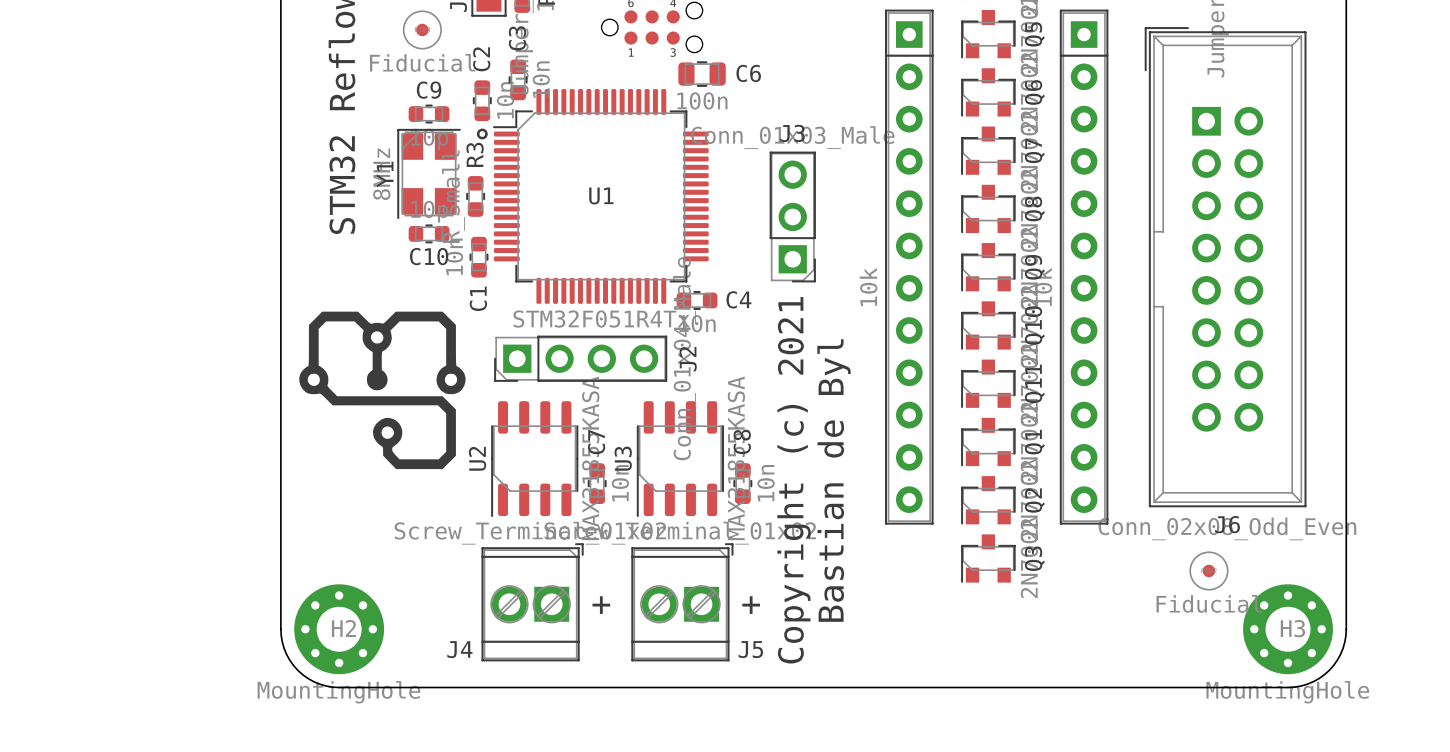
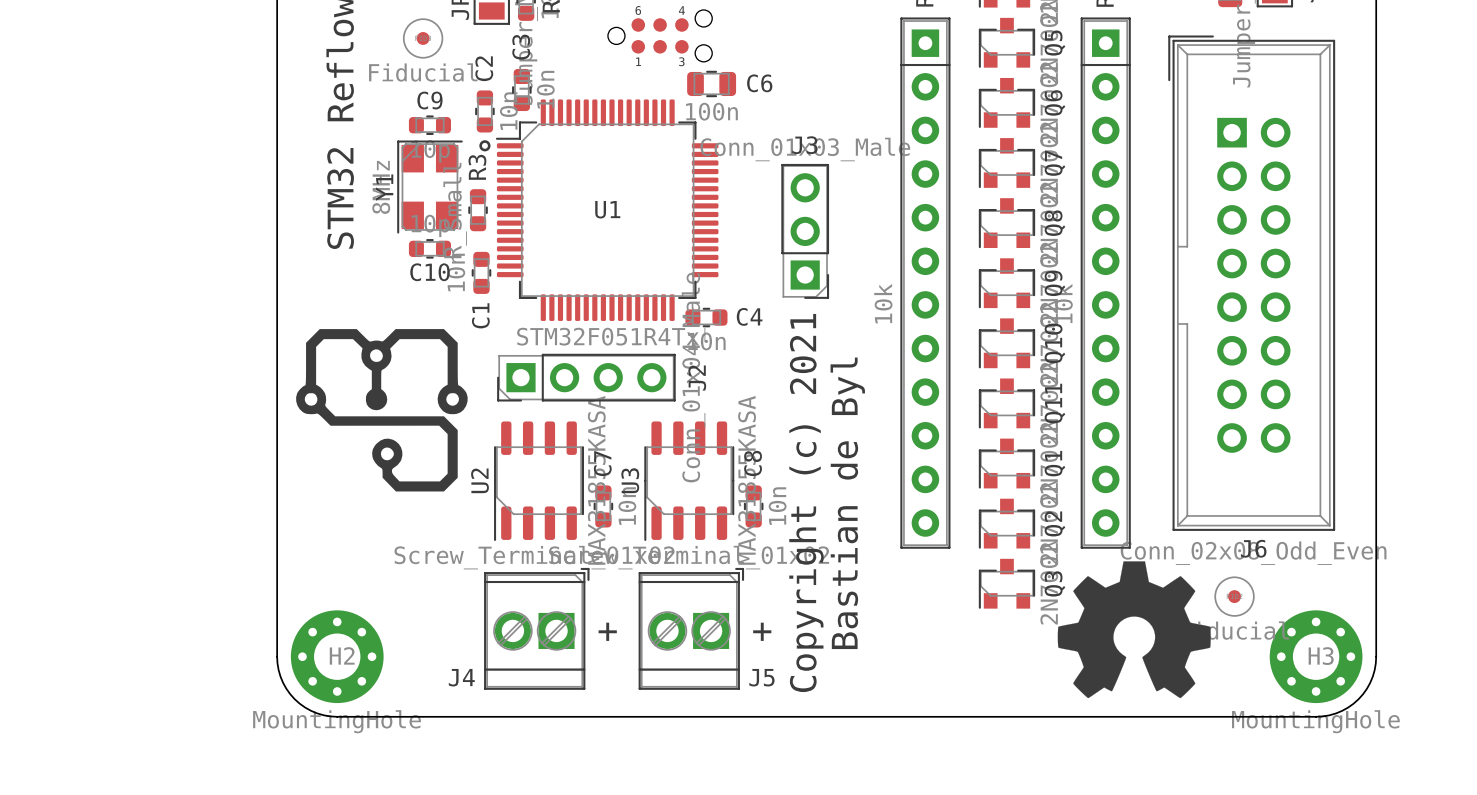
drawing: none -> [1057, 561, 1211, 699]

